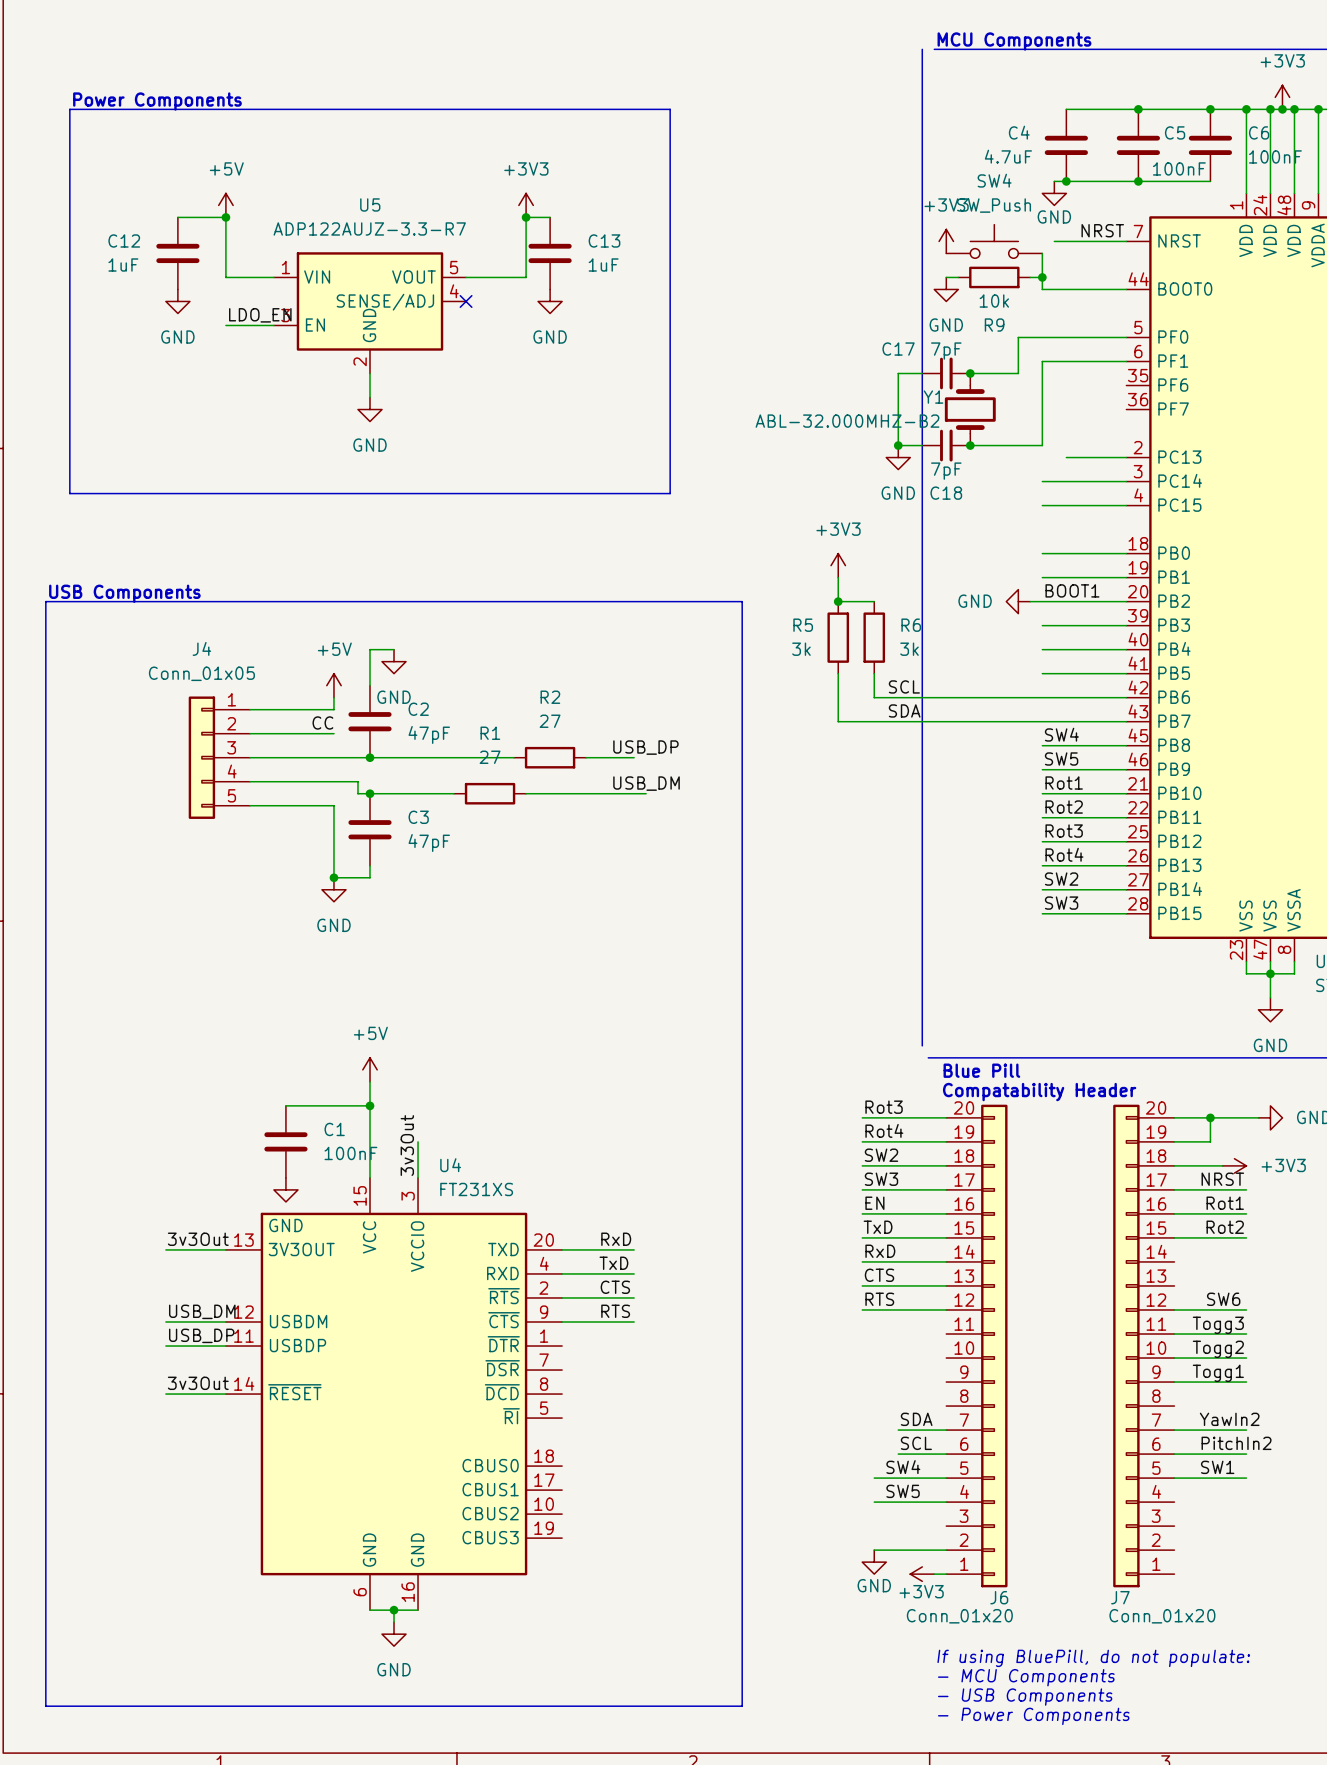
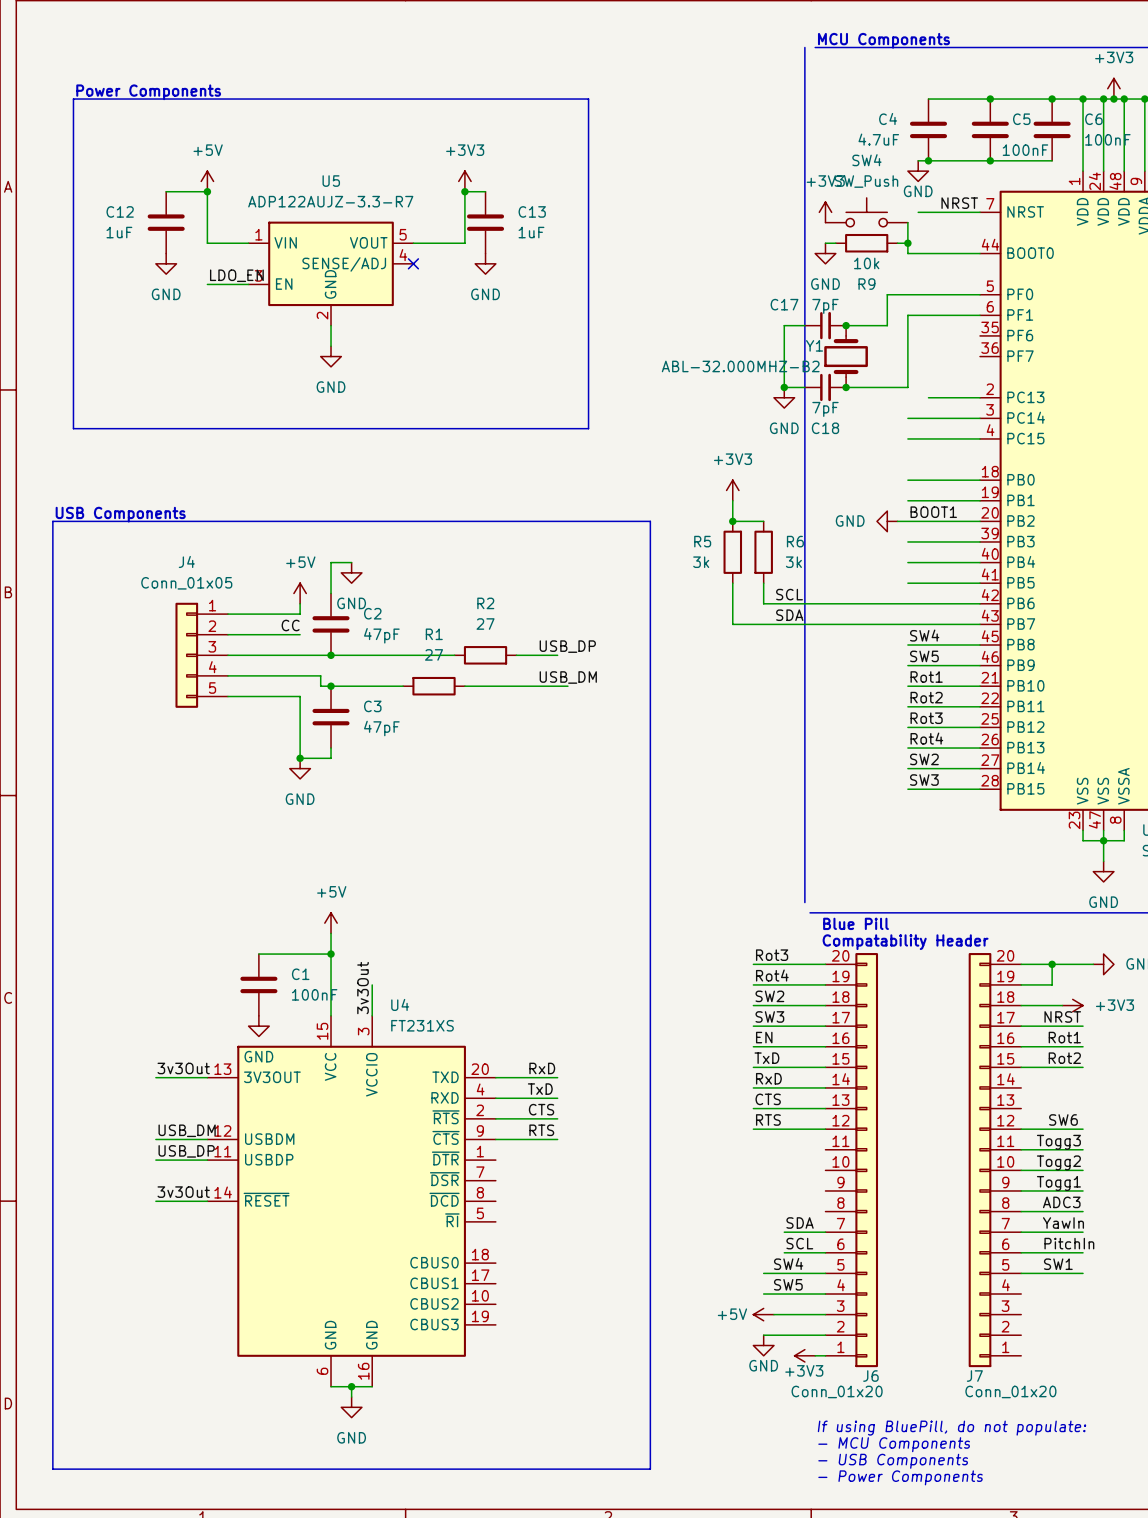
label: none -> ADC3 (1061, 1202)
wire: none -> (1021, 1211) (1083, 1211)
label: YawIn2 (1229, 1419) -> YawIn (1063, 1223)
label: PitchIn2 (1236, 1443) -> PitchIn (1069, 1243)
power symbol: none -> +5V (763, 1314)
wire: none -> (773, 1314) (825, 1314)

